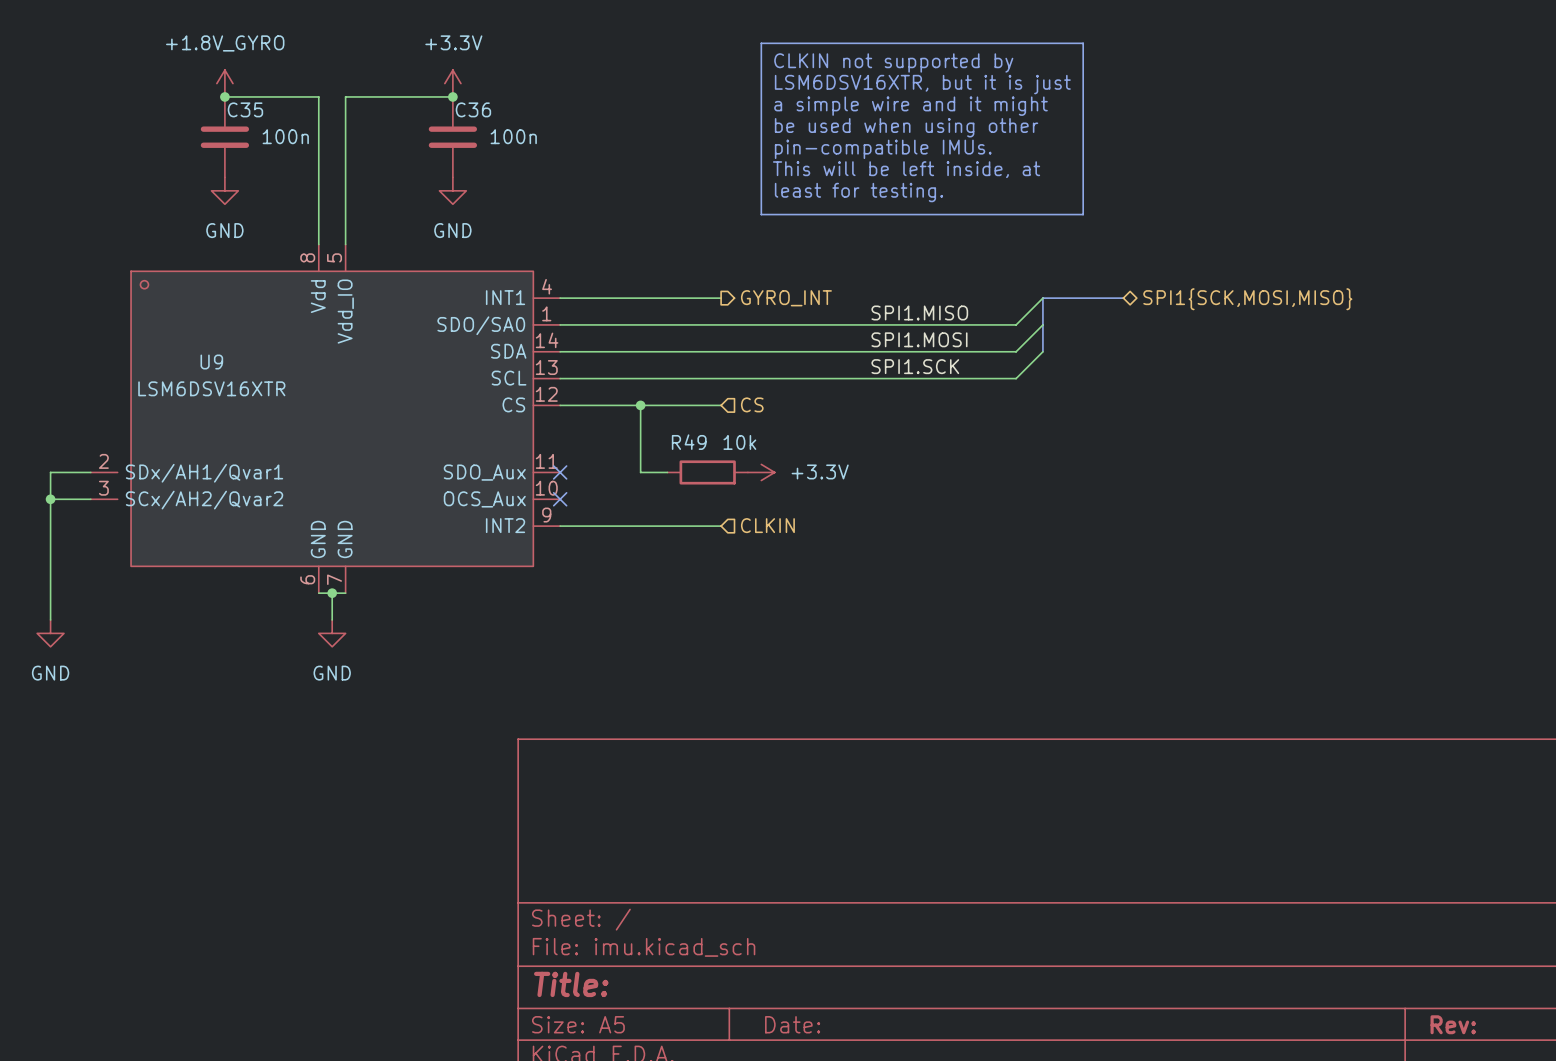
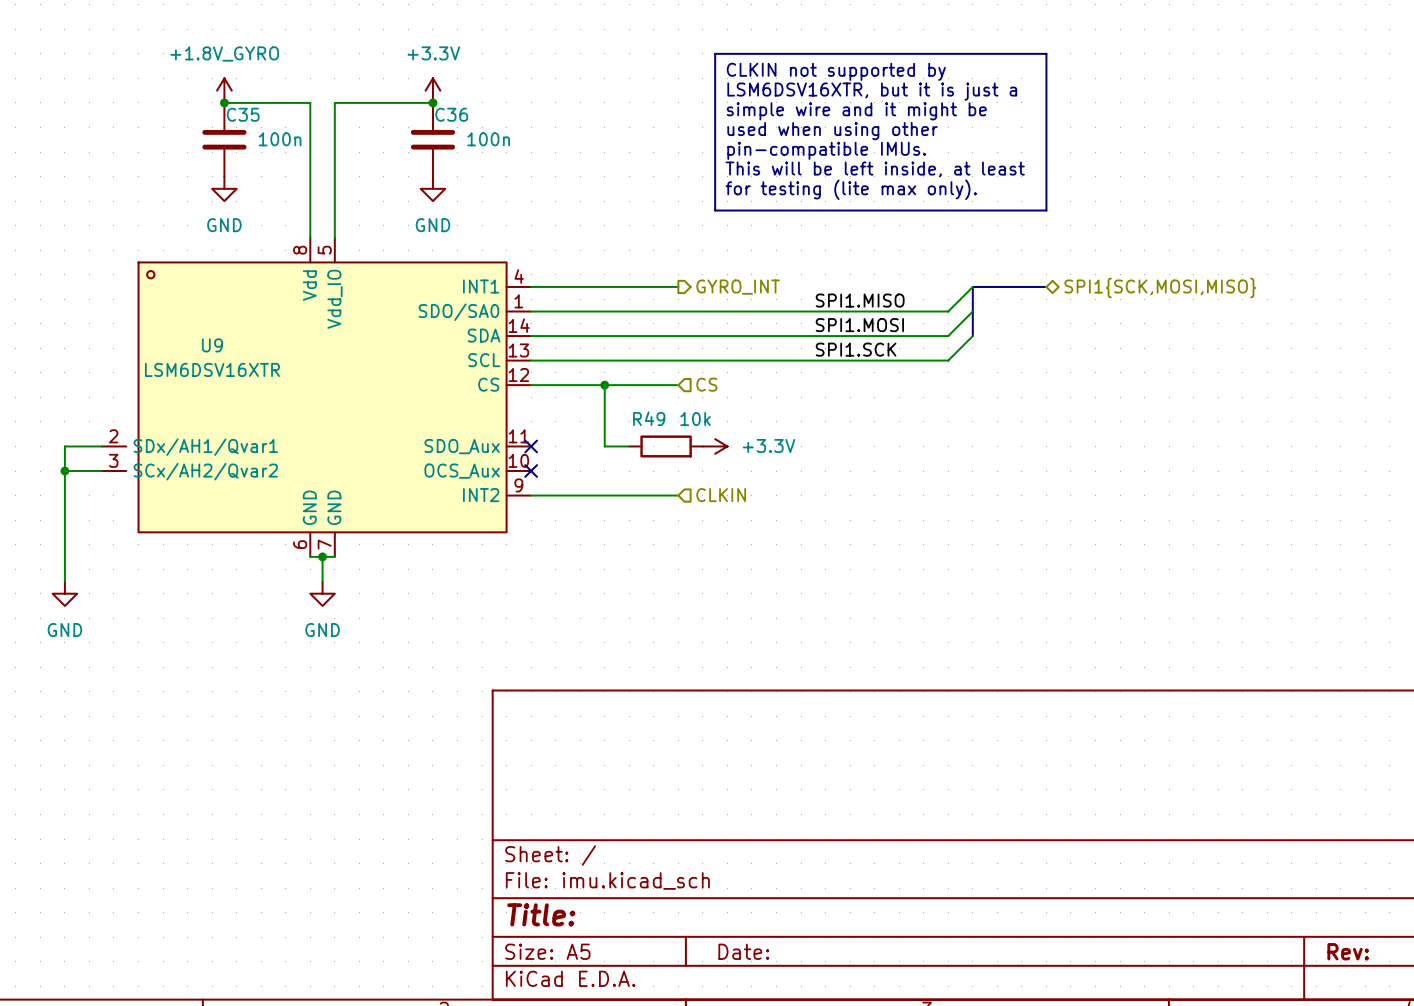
line: (1083, 43) (1083, 214) -> (1009, 53) (1046, 53) (1046, 210) (1009, 210)
text: LSM6DSV16XTR, but it is just (922, 84) -> LSM6DSV16XTR, but it is just a (872, 91)
text: a simple wire and it might (911, 106) -> simple wire and it might be (856, 111)
text: be used when using other (906, 127) -> used when using other (832, 131)
text: This will be left inside, at (906, 169) -> This will be left inside, at least (875, 169)
text: least for testing. (858, 192) -> for testing (lite max only). (851, 189)

